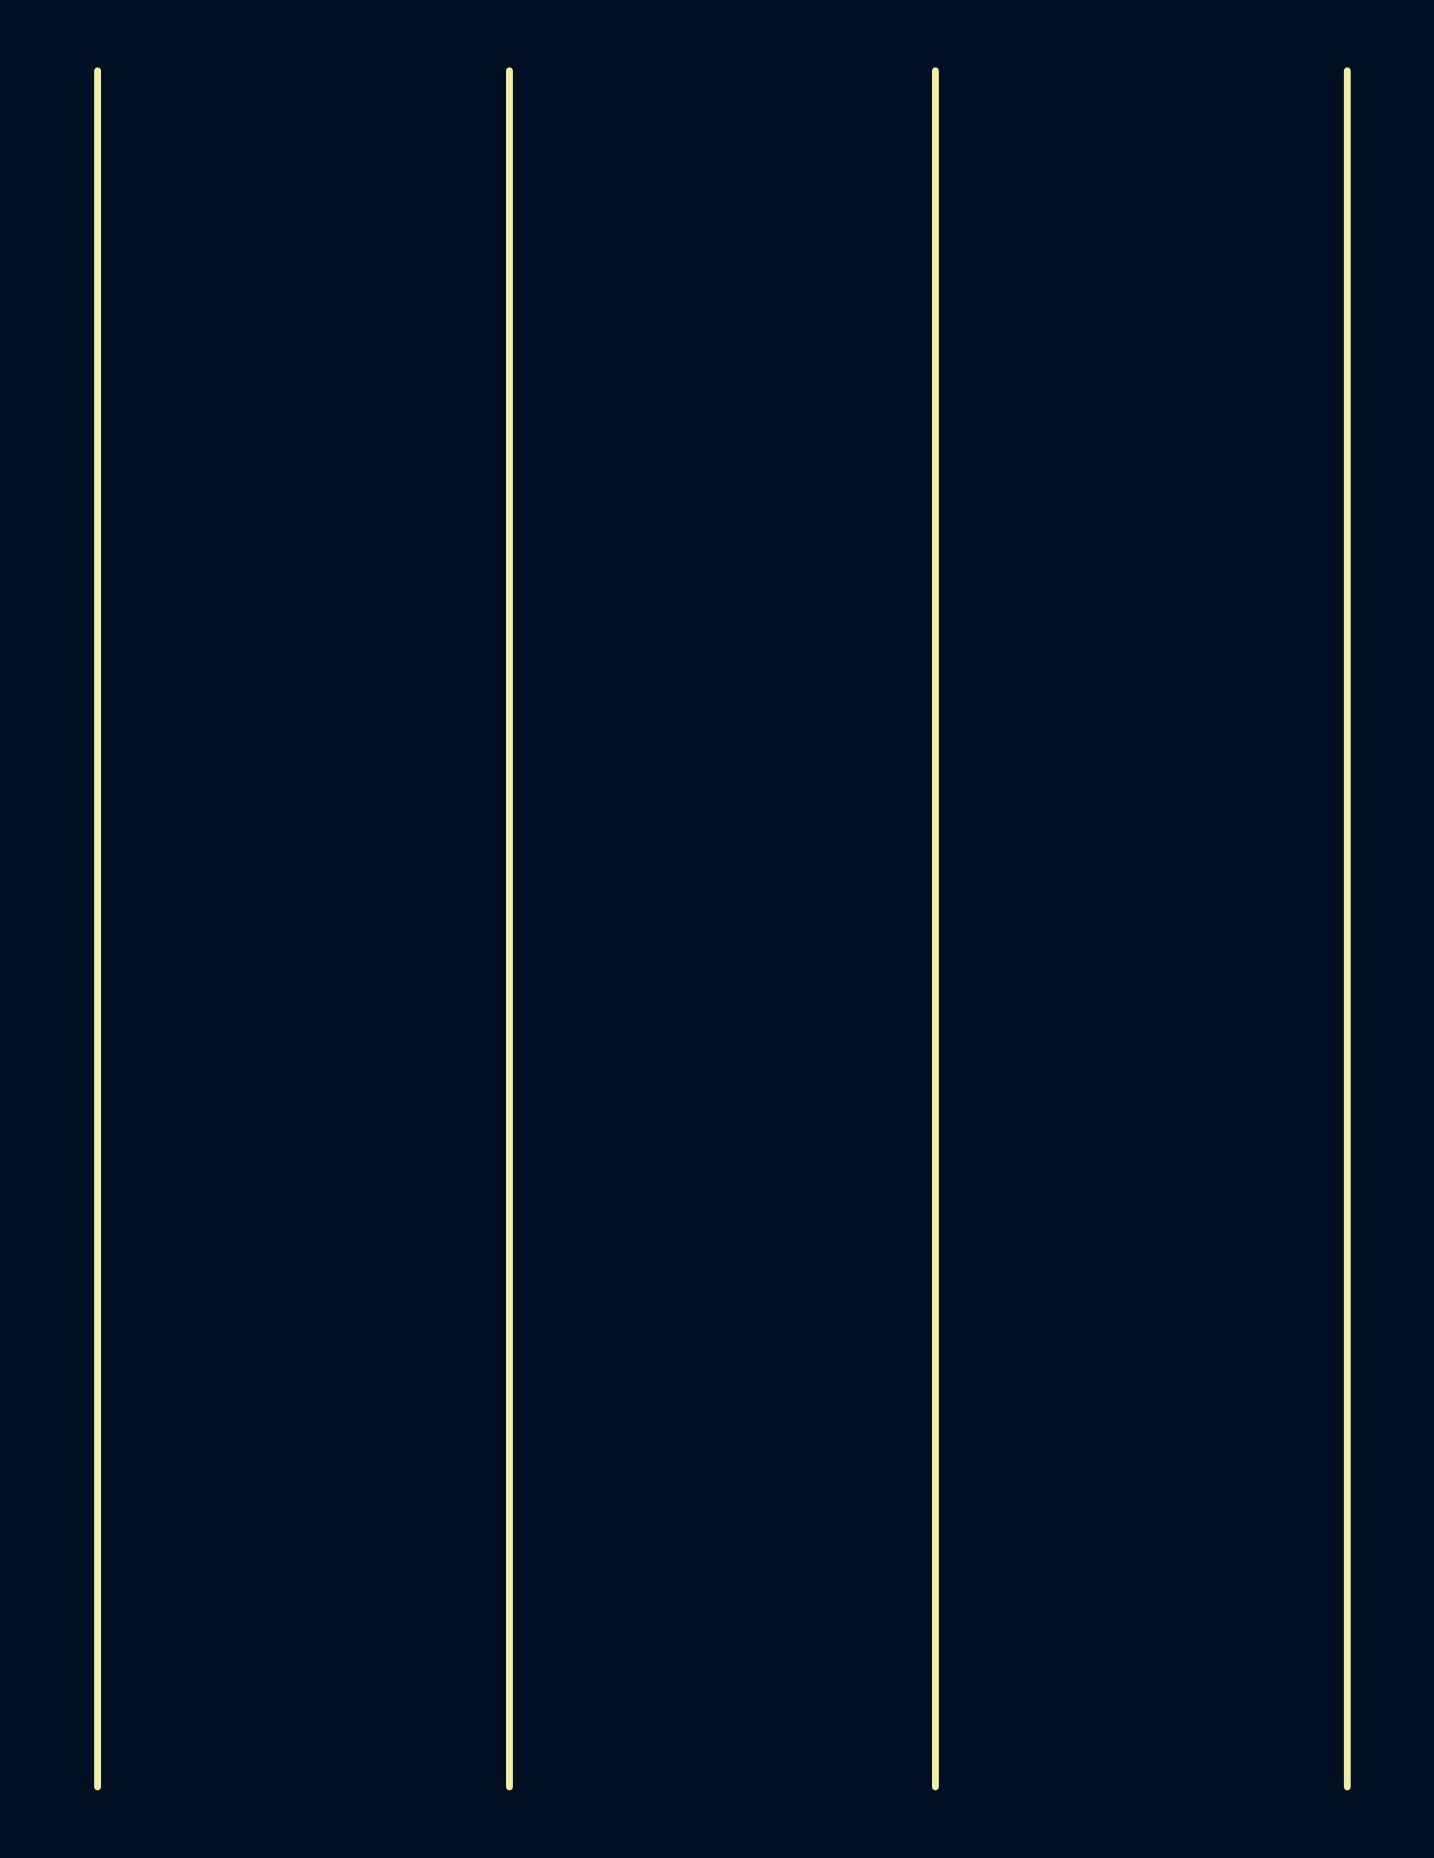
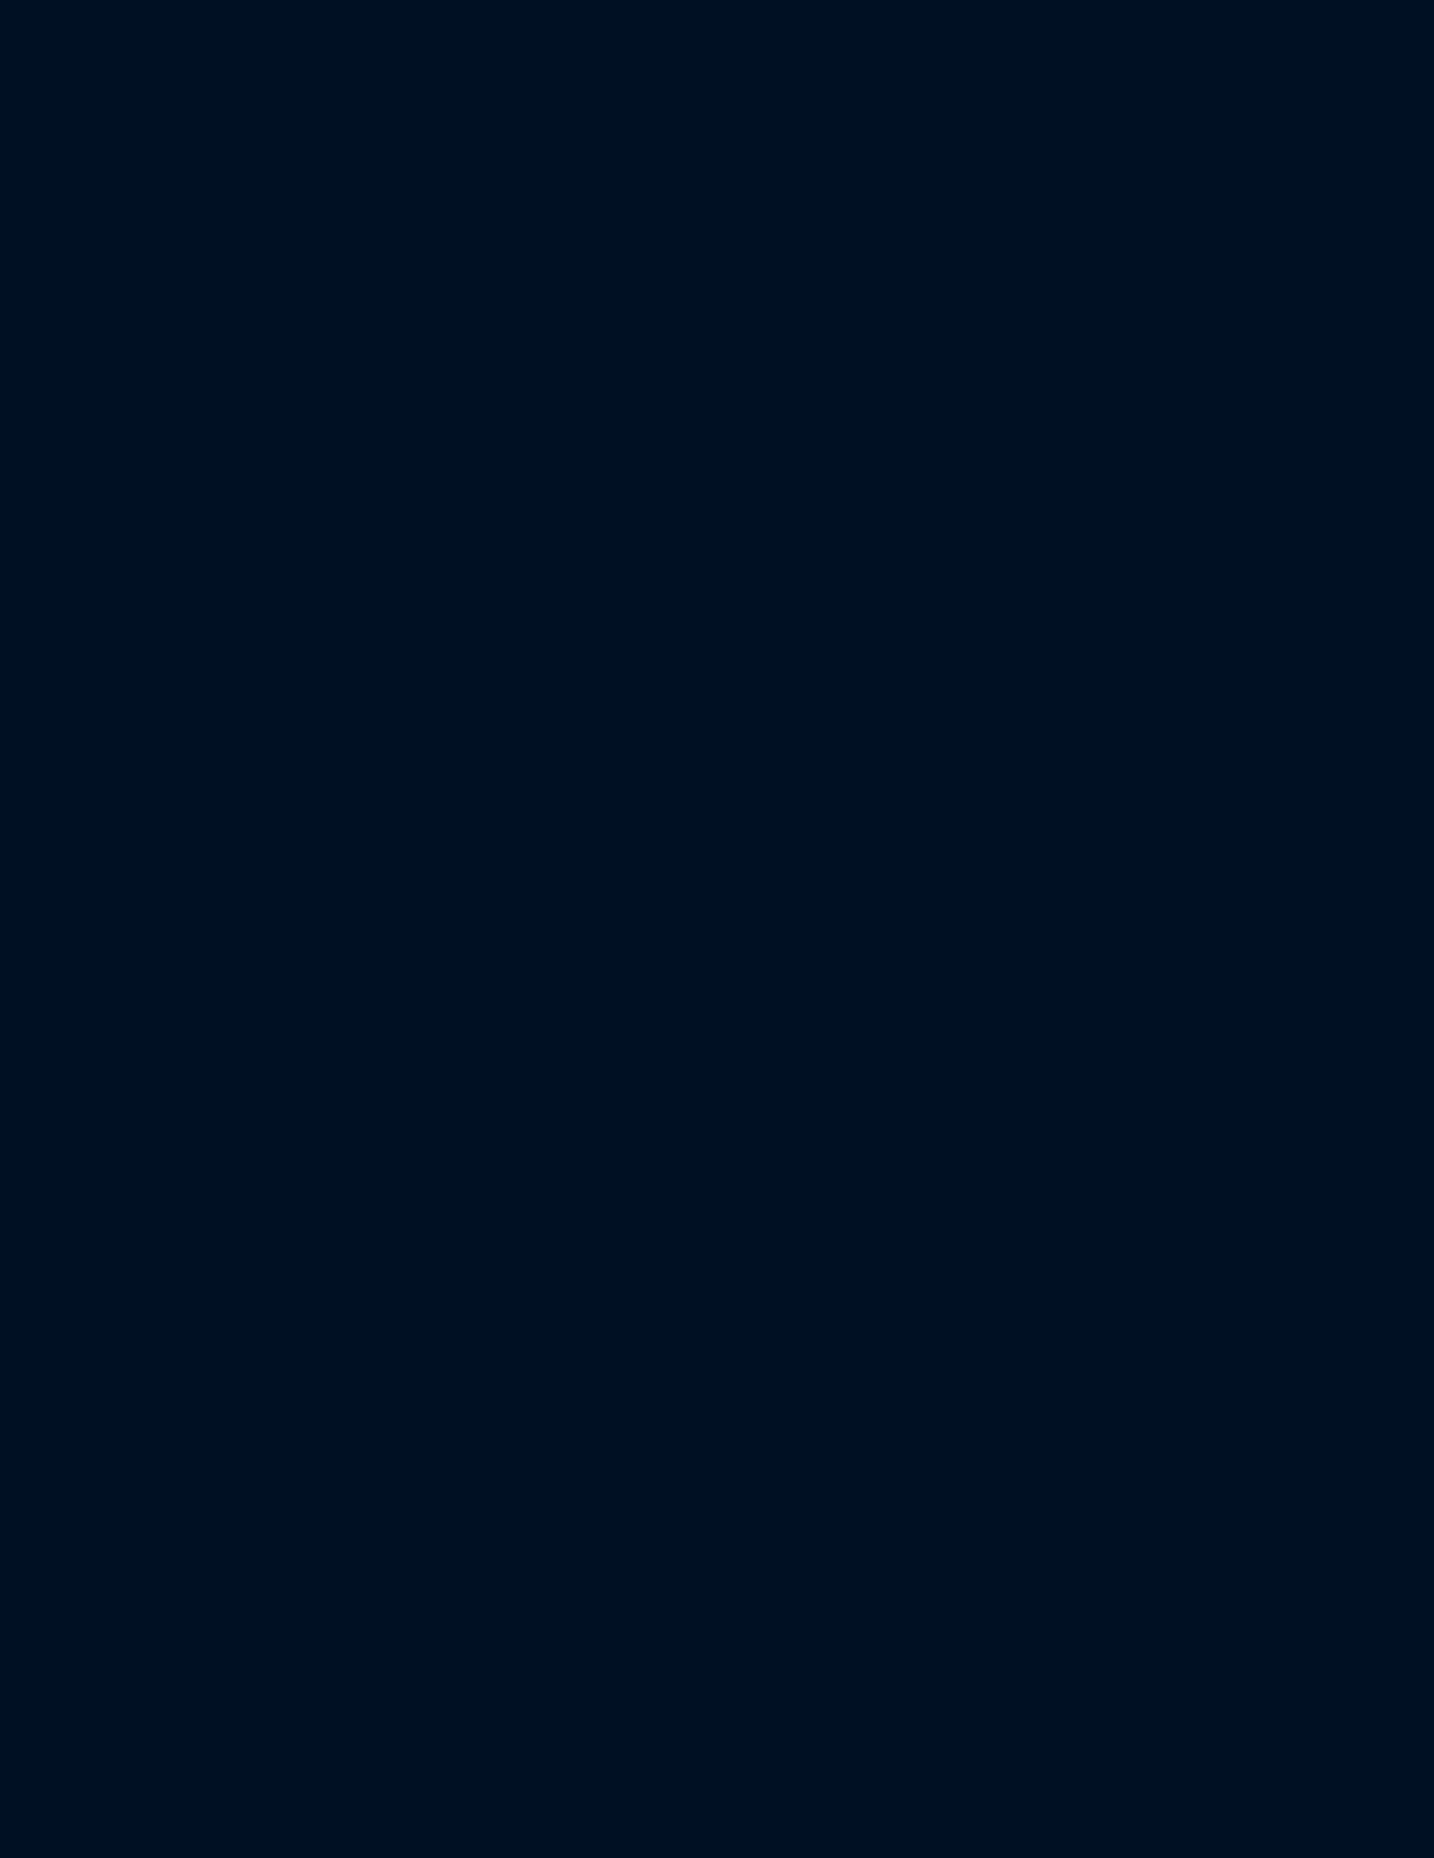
line: (97, 70) (97, 1786) -> none
line: (509, 70) (509, 1786) -> none
line: (935, 70) (935, 1786) -> none
line: (1347, 70) (1347, 1786) -> none

